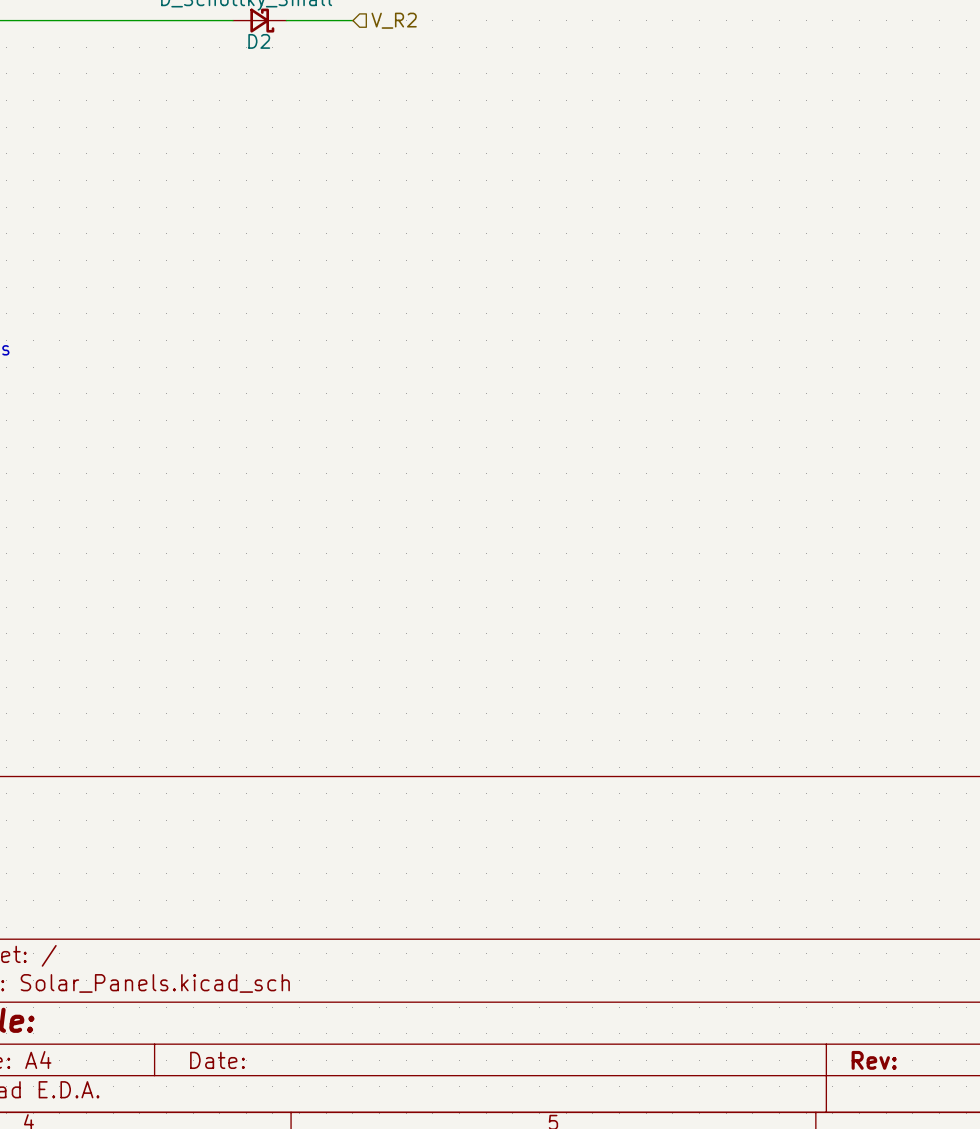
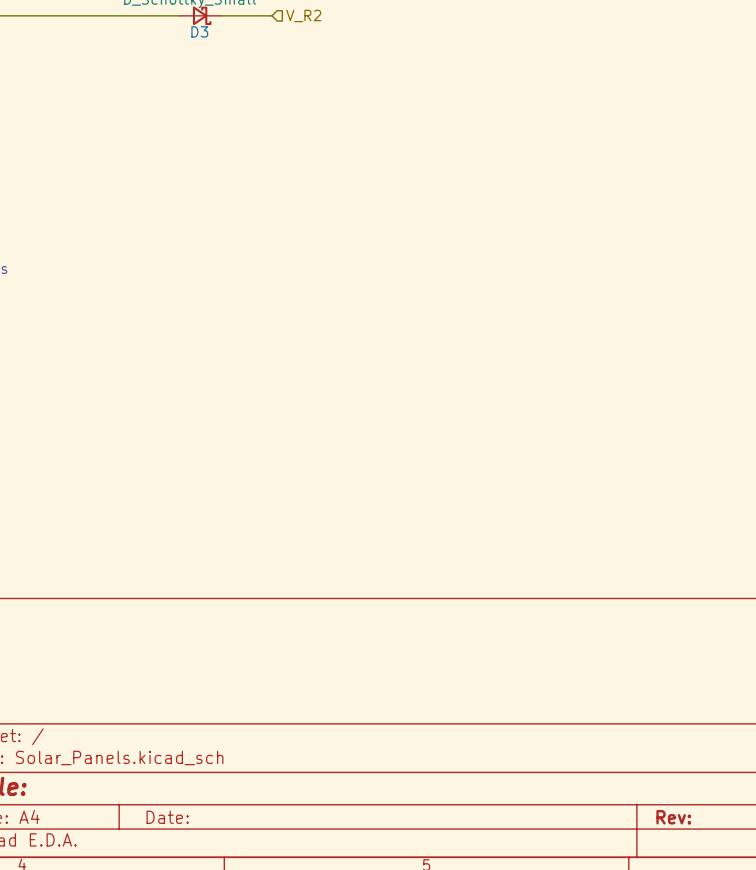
D2 name: D2 (259, 41) -> D3 (199, 31)

